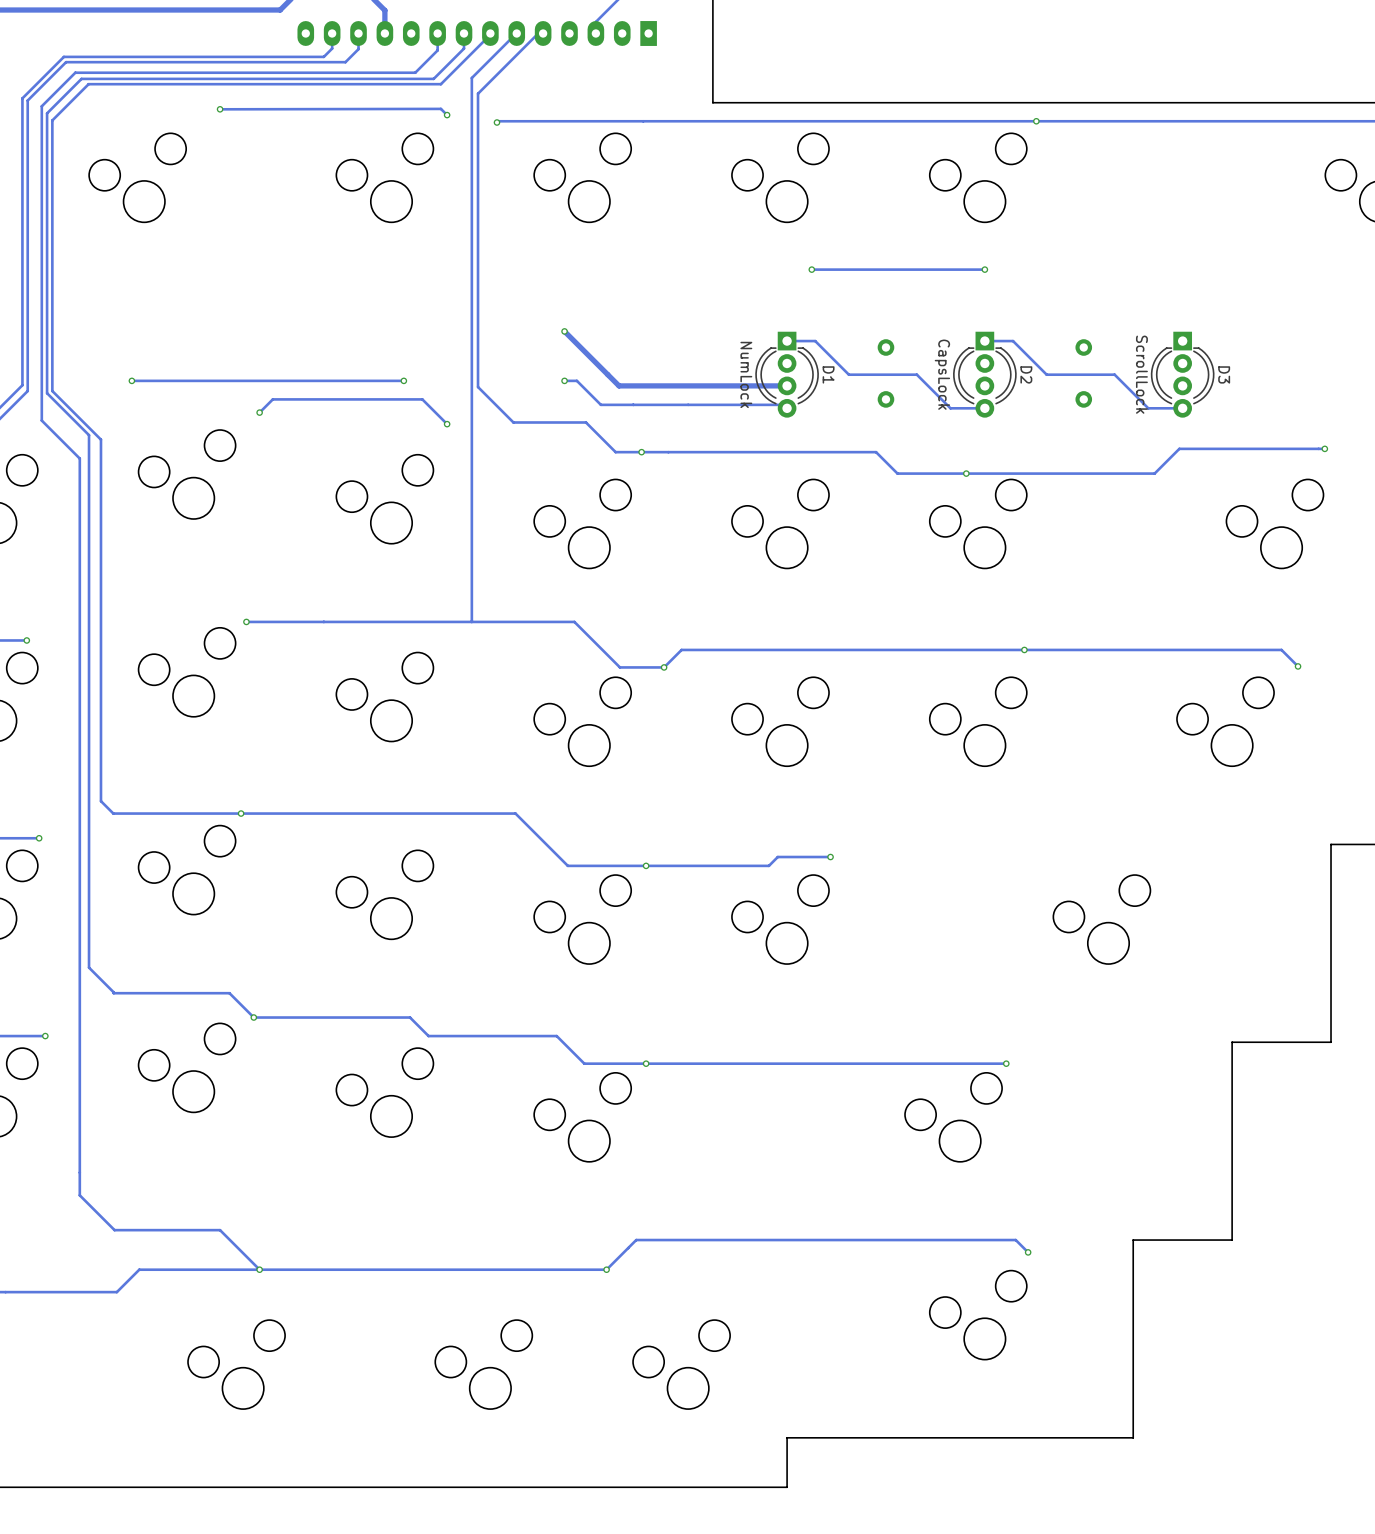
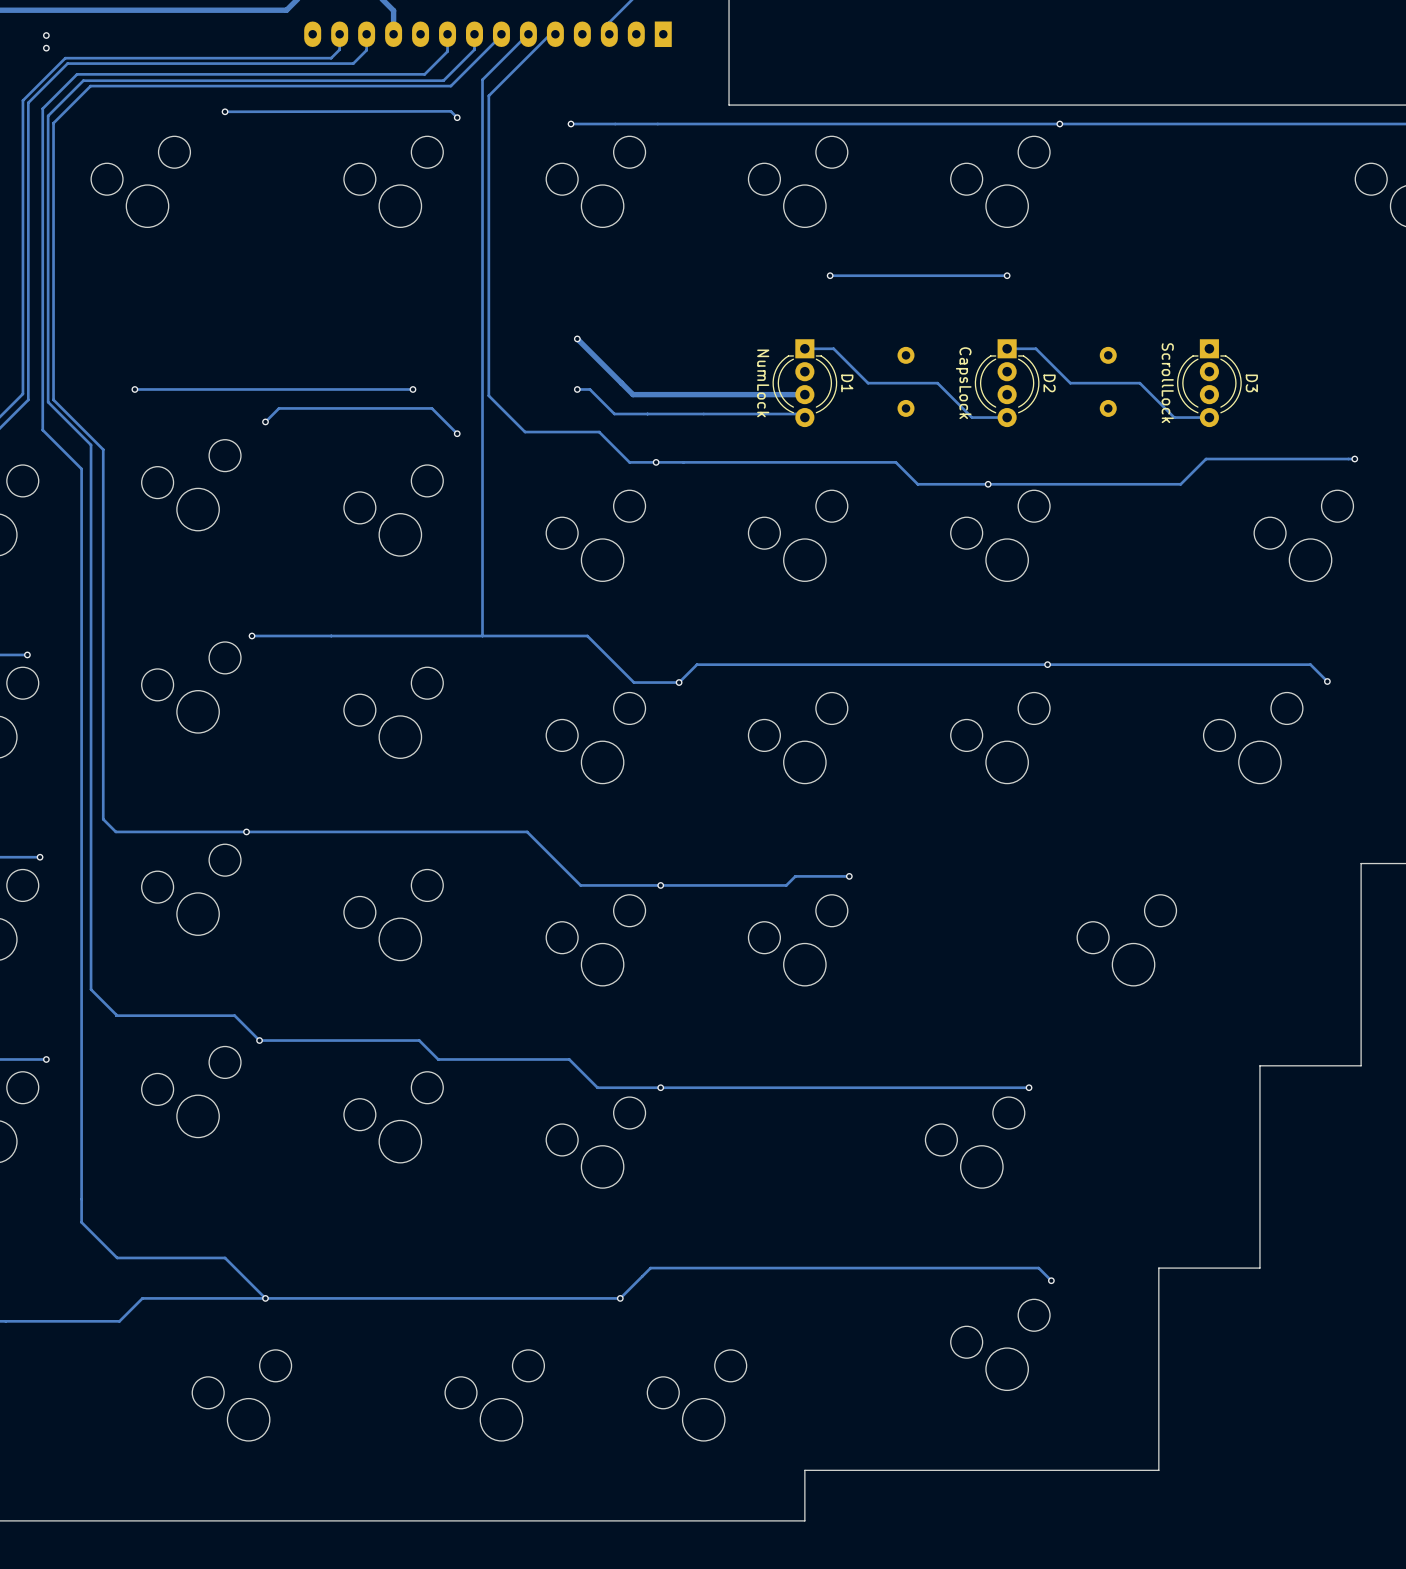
via: none -> (46, 35)
via: none -> (46, 48)
track: (558, 121) (496, 122) -> none
via position: (496, 122) -> (571, 124)

